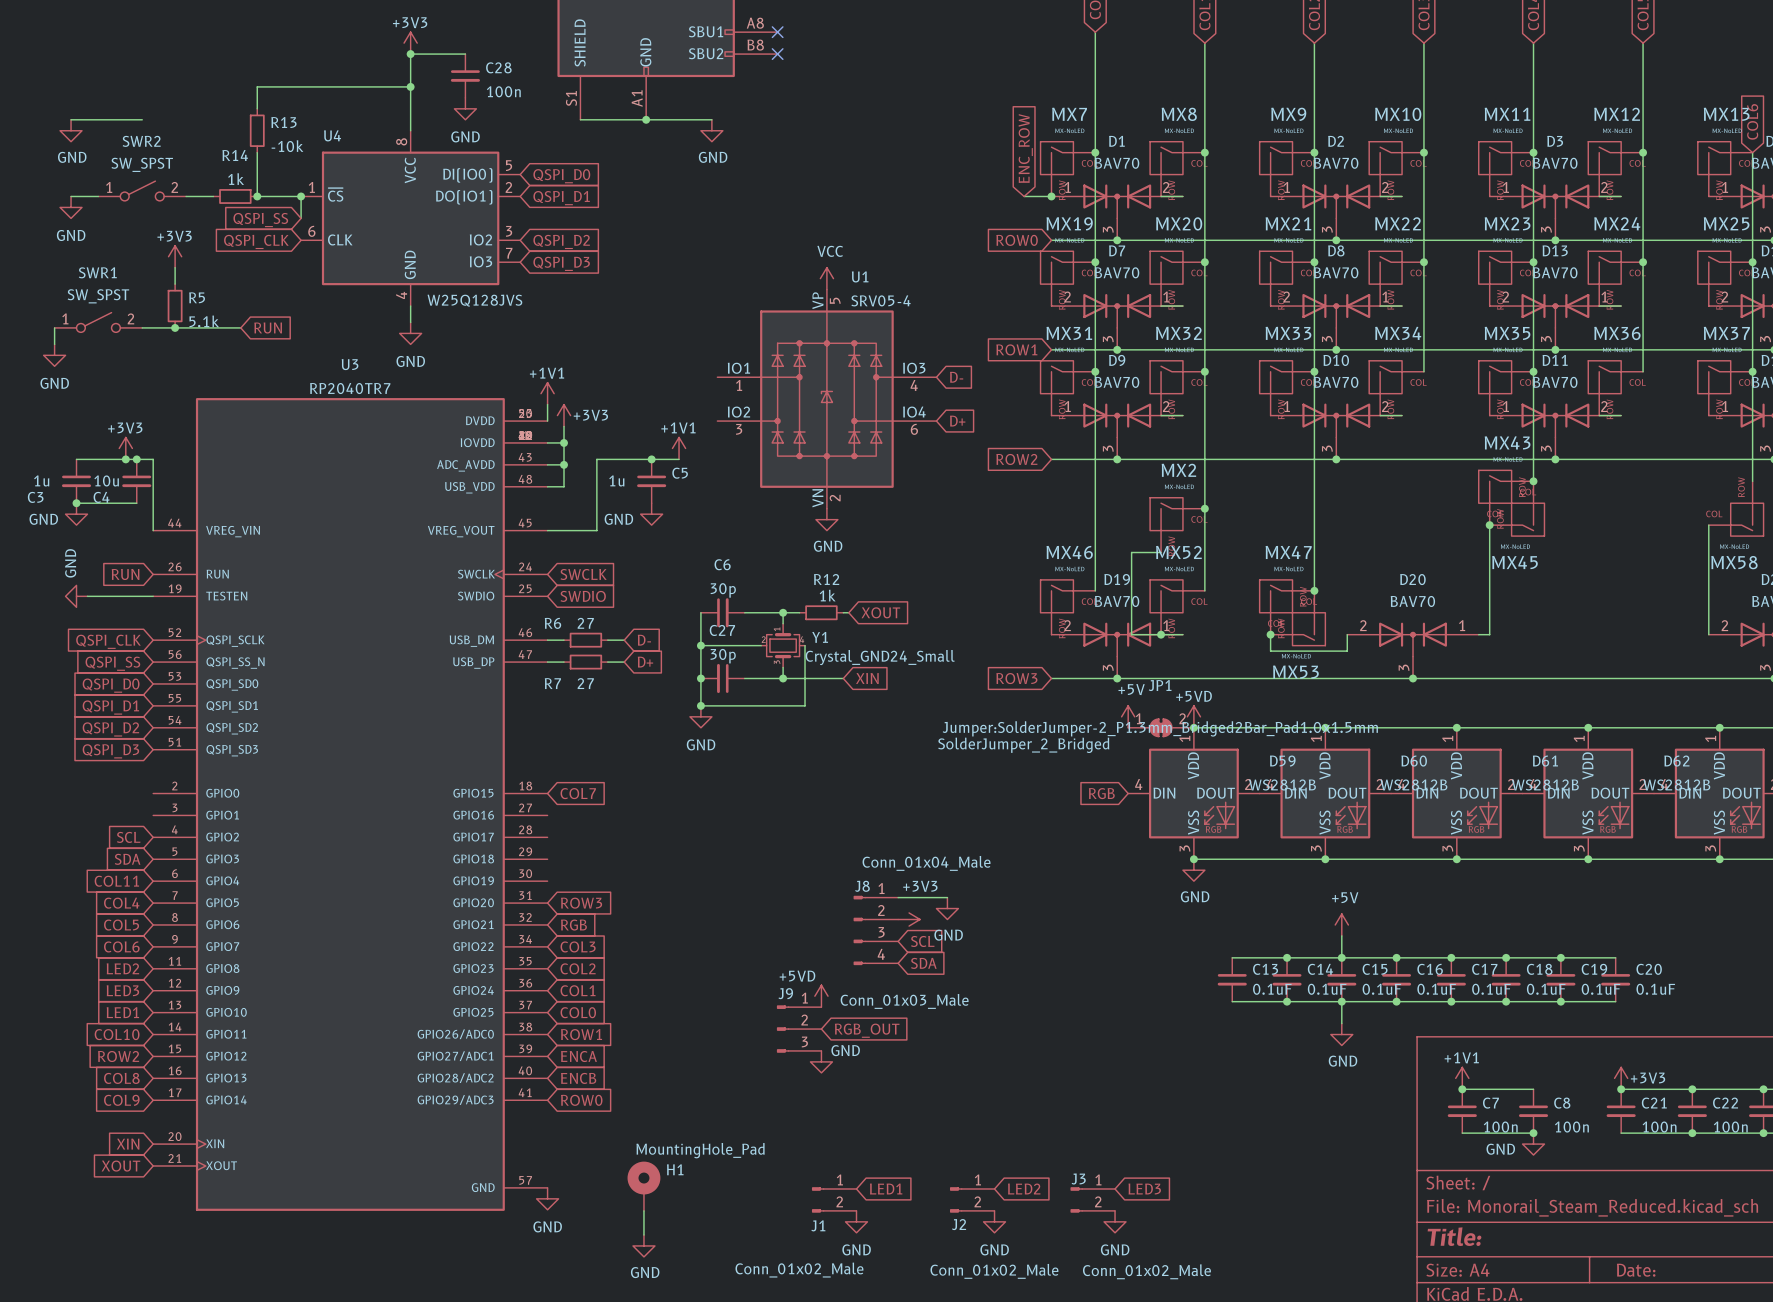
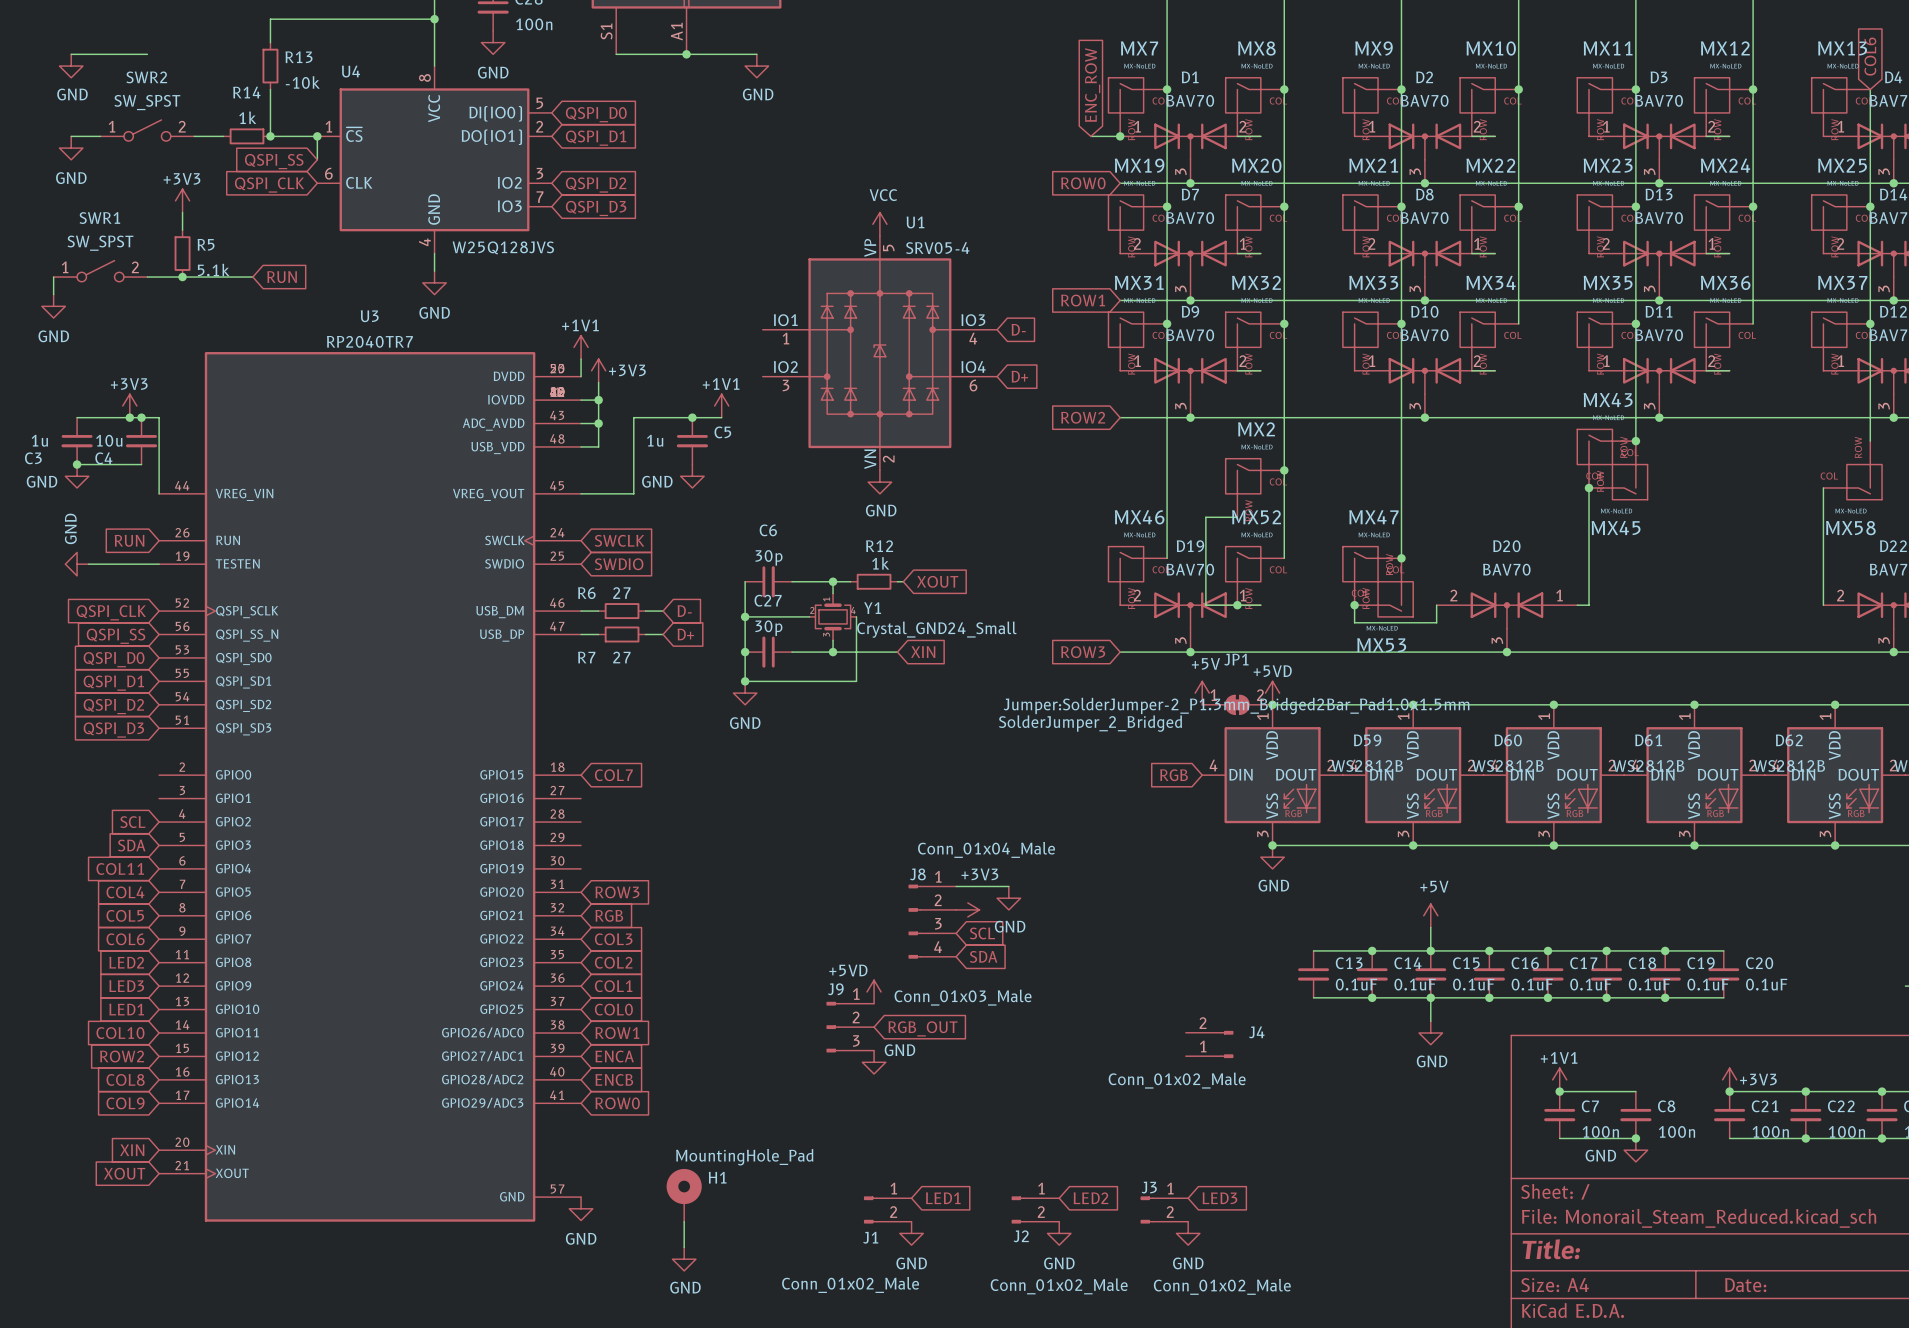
J4: none -> Conn_01x02_Male (1209, 1044)

